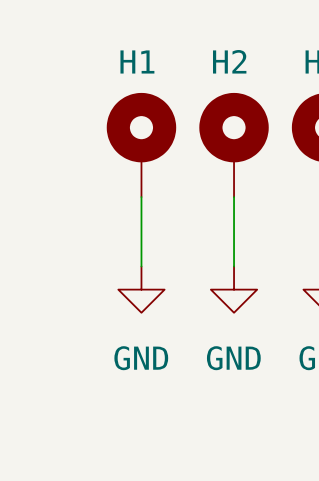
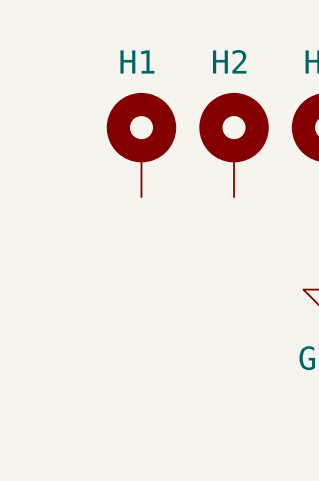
wire: (141, 197) (141, 266) -> none
wire: (234, 197) (234, 266) -> none
power symbol: GND (141, 289) -> none
power symbol: GND (234, 289) -> none

